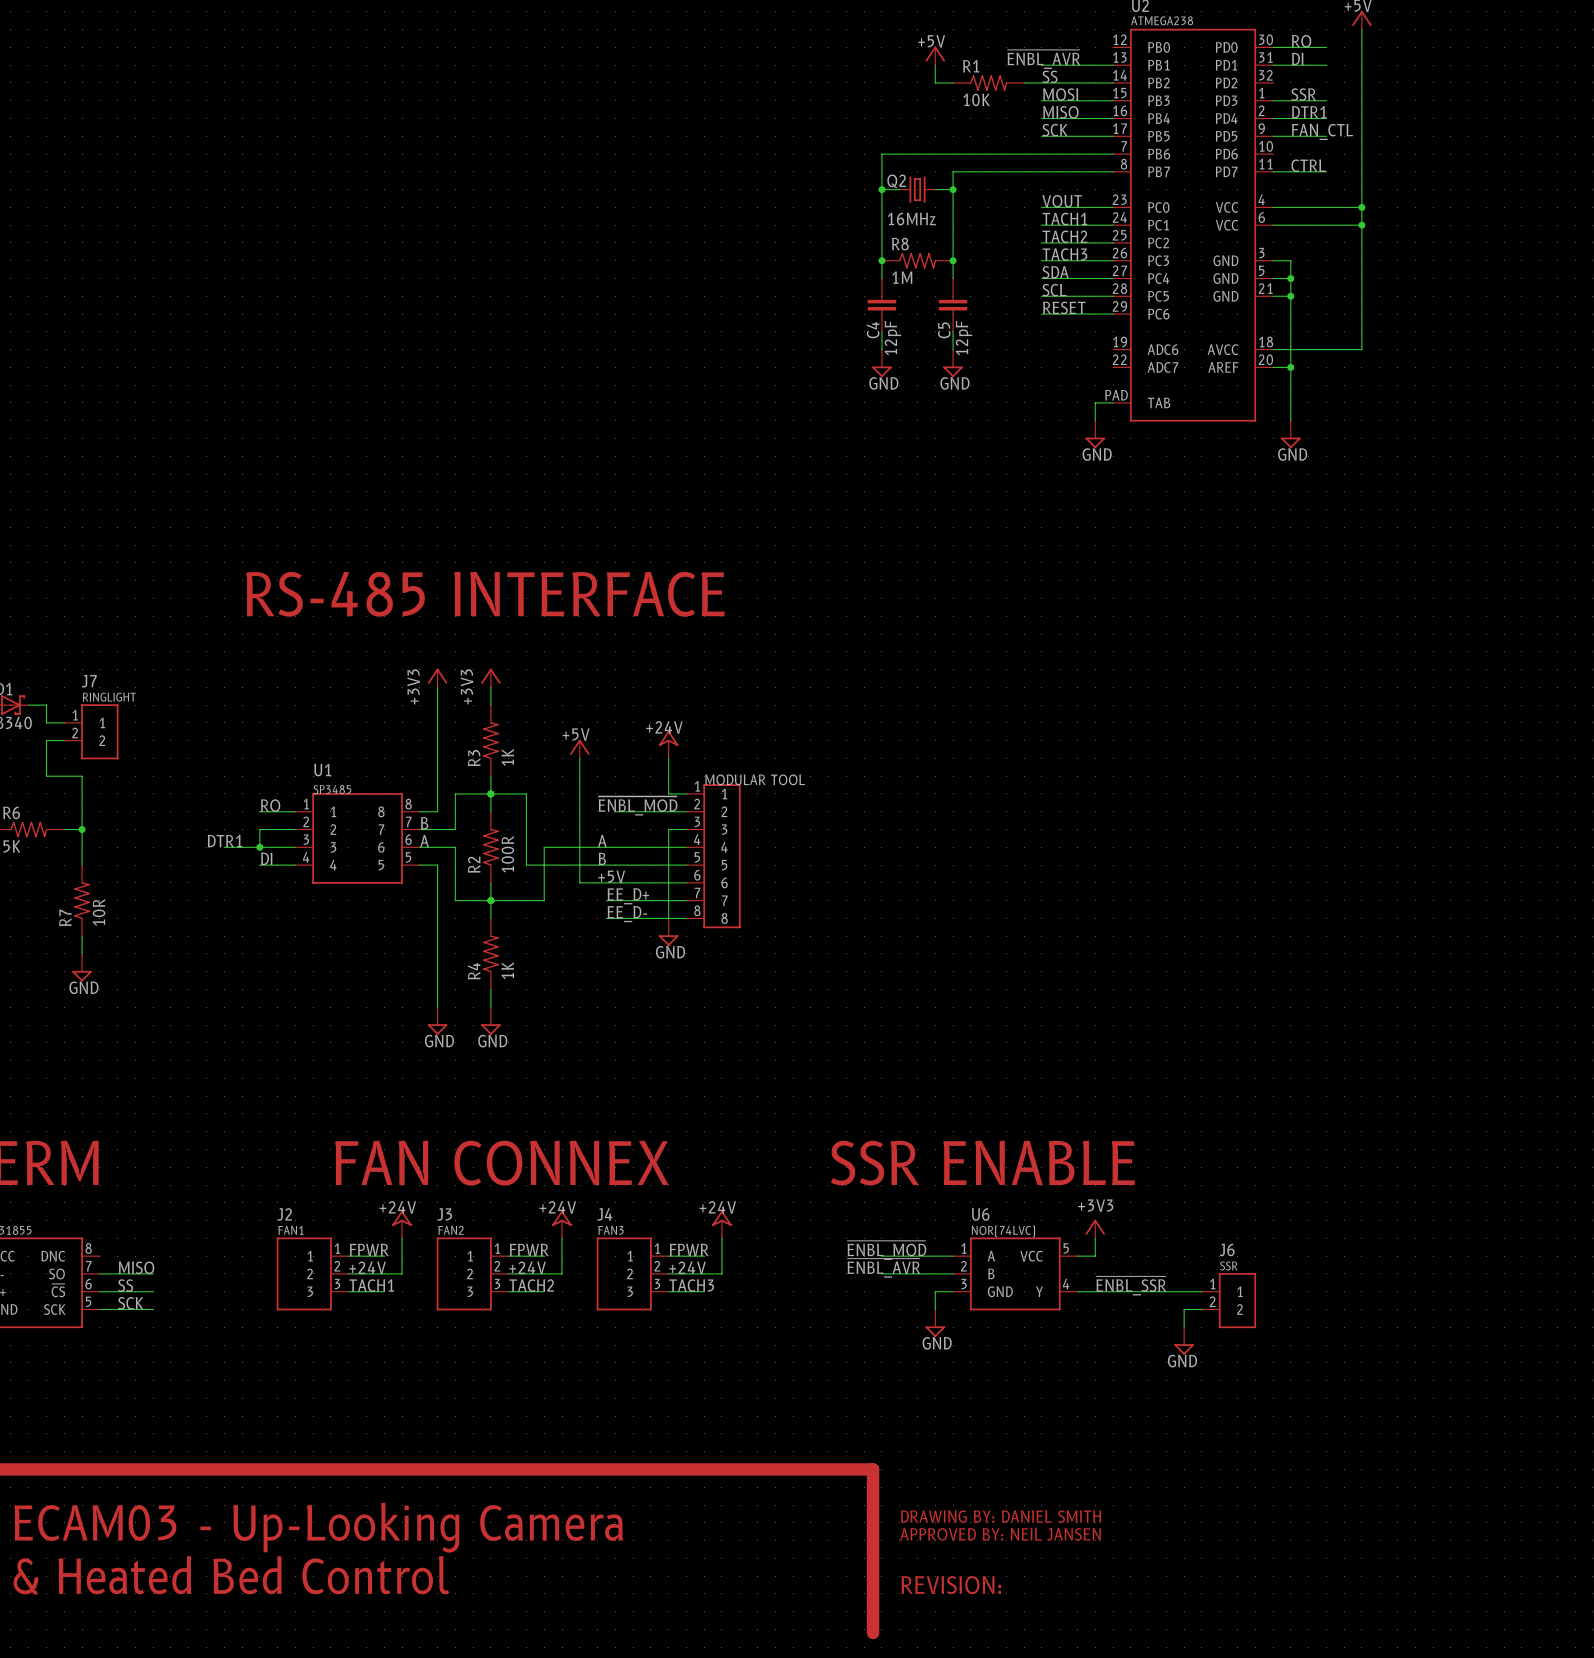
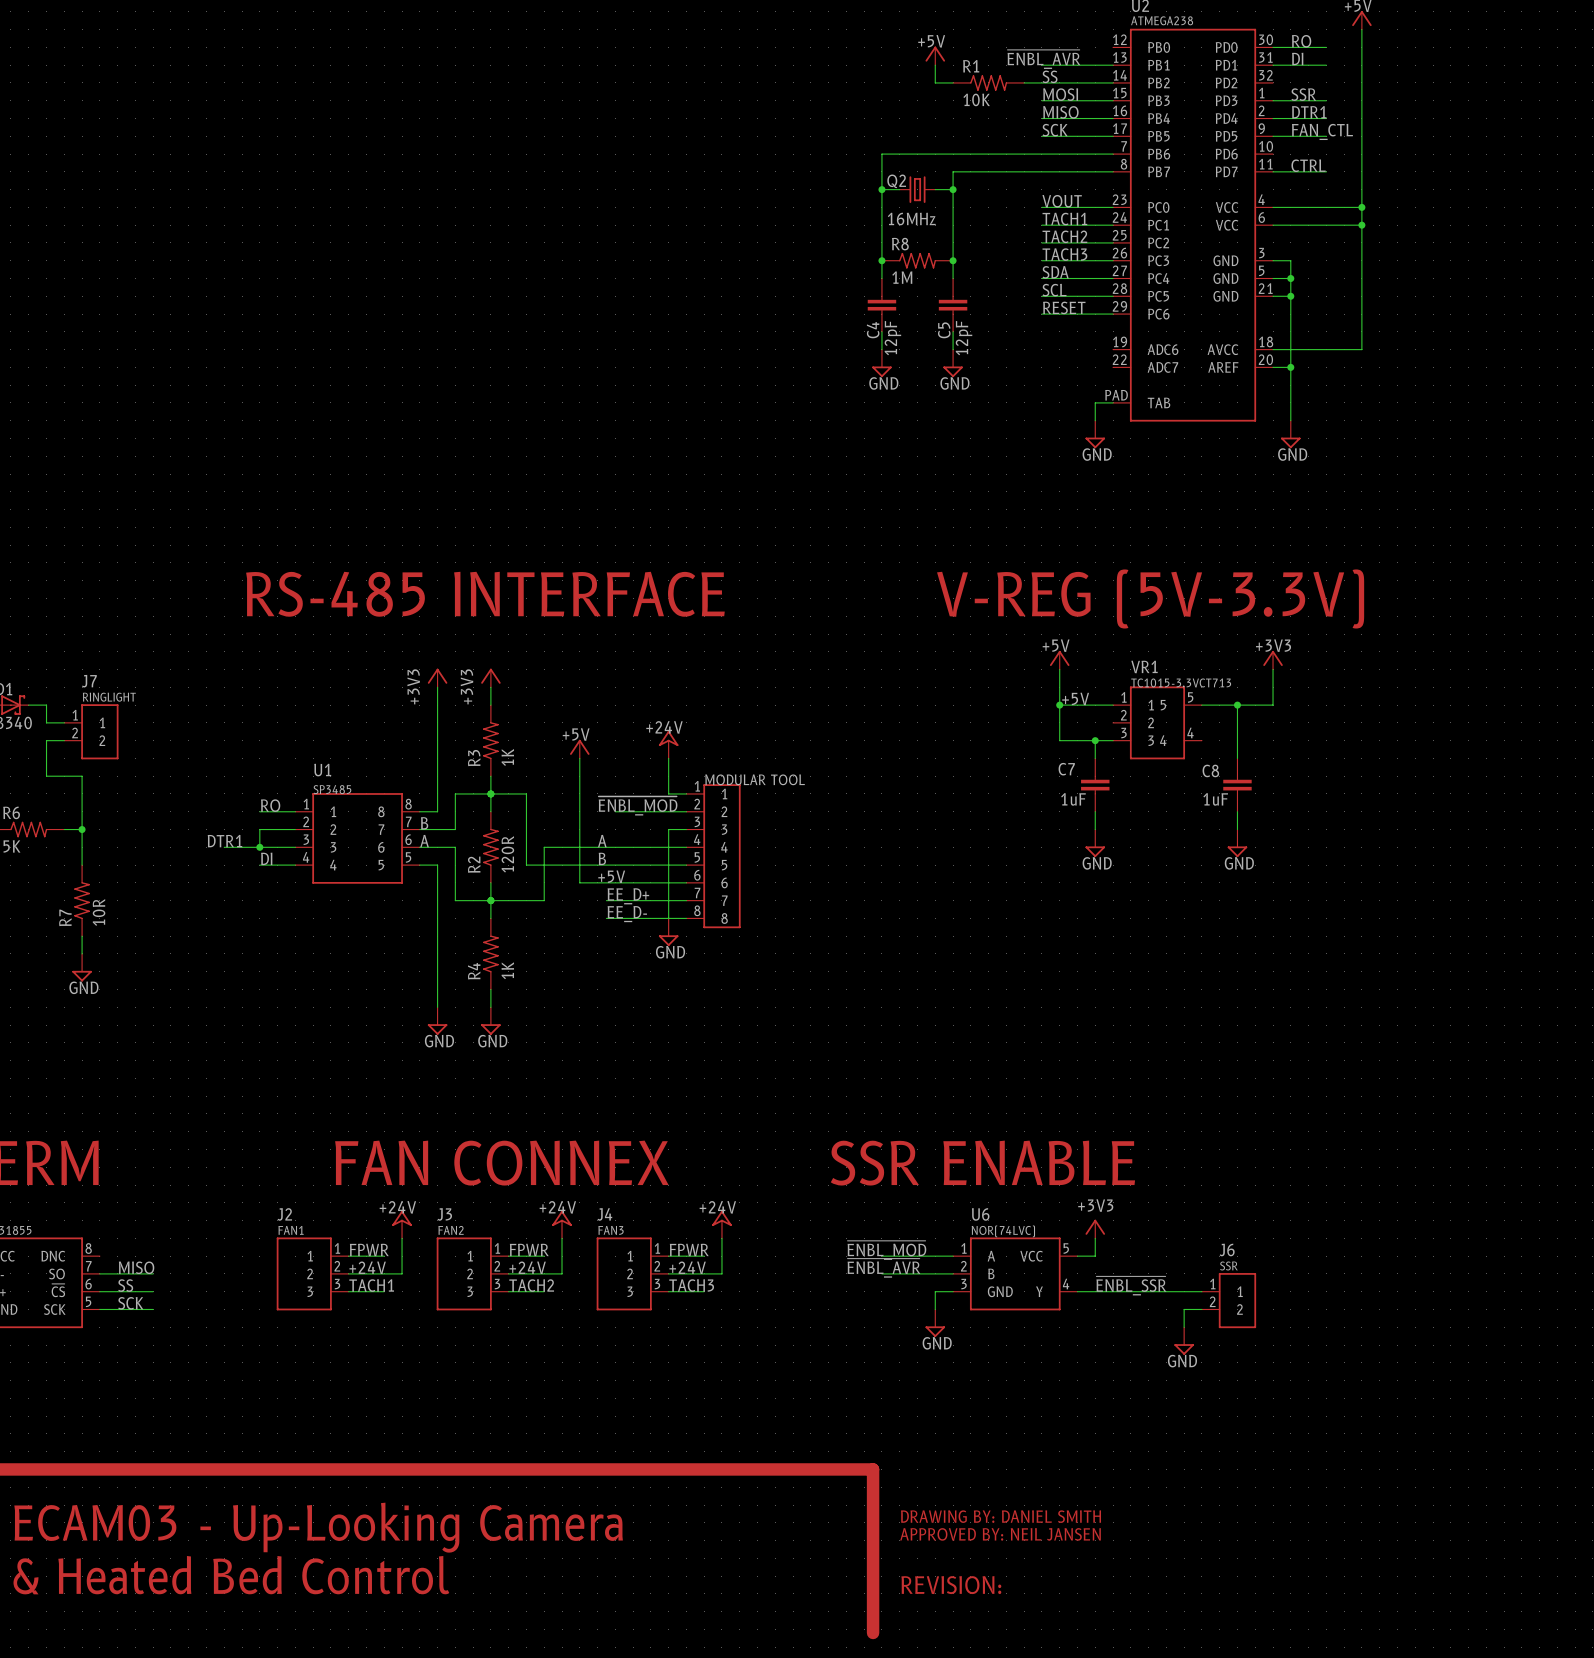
text: none -> V-REG (5V-3.3V) (1150, 598)
power symbol: none -> +5V (1059, 660)
power symbol: none -> +3V3 (1273, 660)
wire: none -> (1059, 669) (1059, 740) (1113, 740)
wire: none -> (1273, 669) (1273, 705) (1201, 705)
label: none -> +5V (1075, 698)
wire: none -> (1059, 705) (1113, 705)
junction: none -> (1059, 705)
wire: none -> (1237, 705) (1237, 758)
junction: none -> (1237, 705)
VR1: none -> TC1015-3.3VCT713 (1157, 722)
wire: none -> (1095, 740) (1095, 758)
junction: none -> (1095, 740)
C7: none -> 1uF (1095, 785)
C8: none -> 1uF (1237, 785)
wire: none -> (1095, 811) (1095, 829)
wire: none -> (1237, 811) (1237, 829)
power symbol: none -> GND (1095, 843)
power symbol: none -> GND (1237, 843)
R2 value: 100R (507, 854) -> 120R (507, 854)

